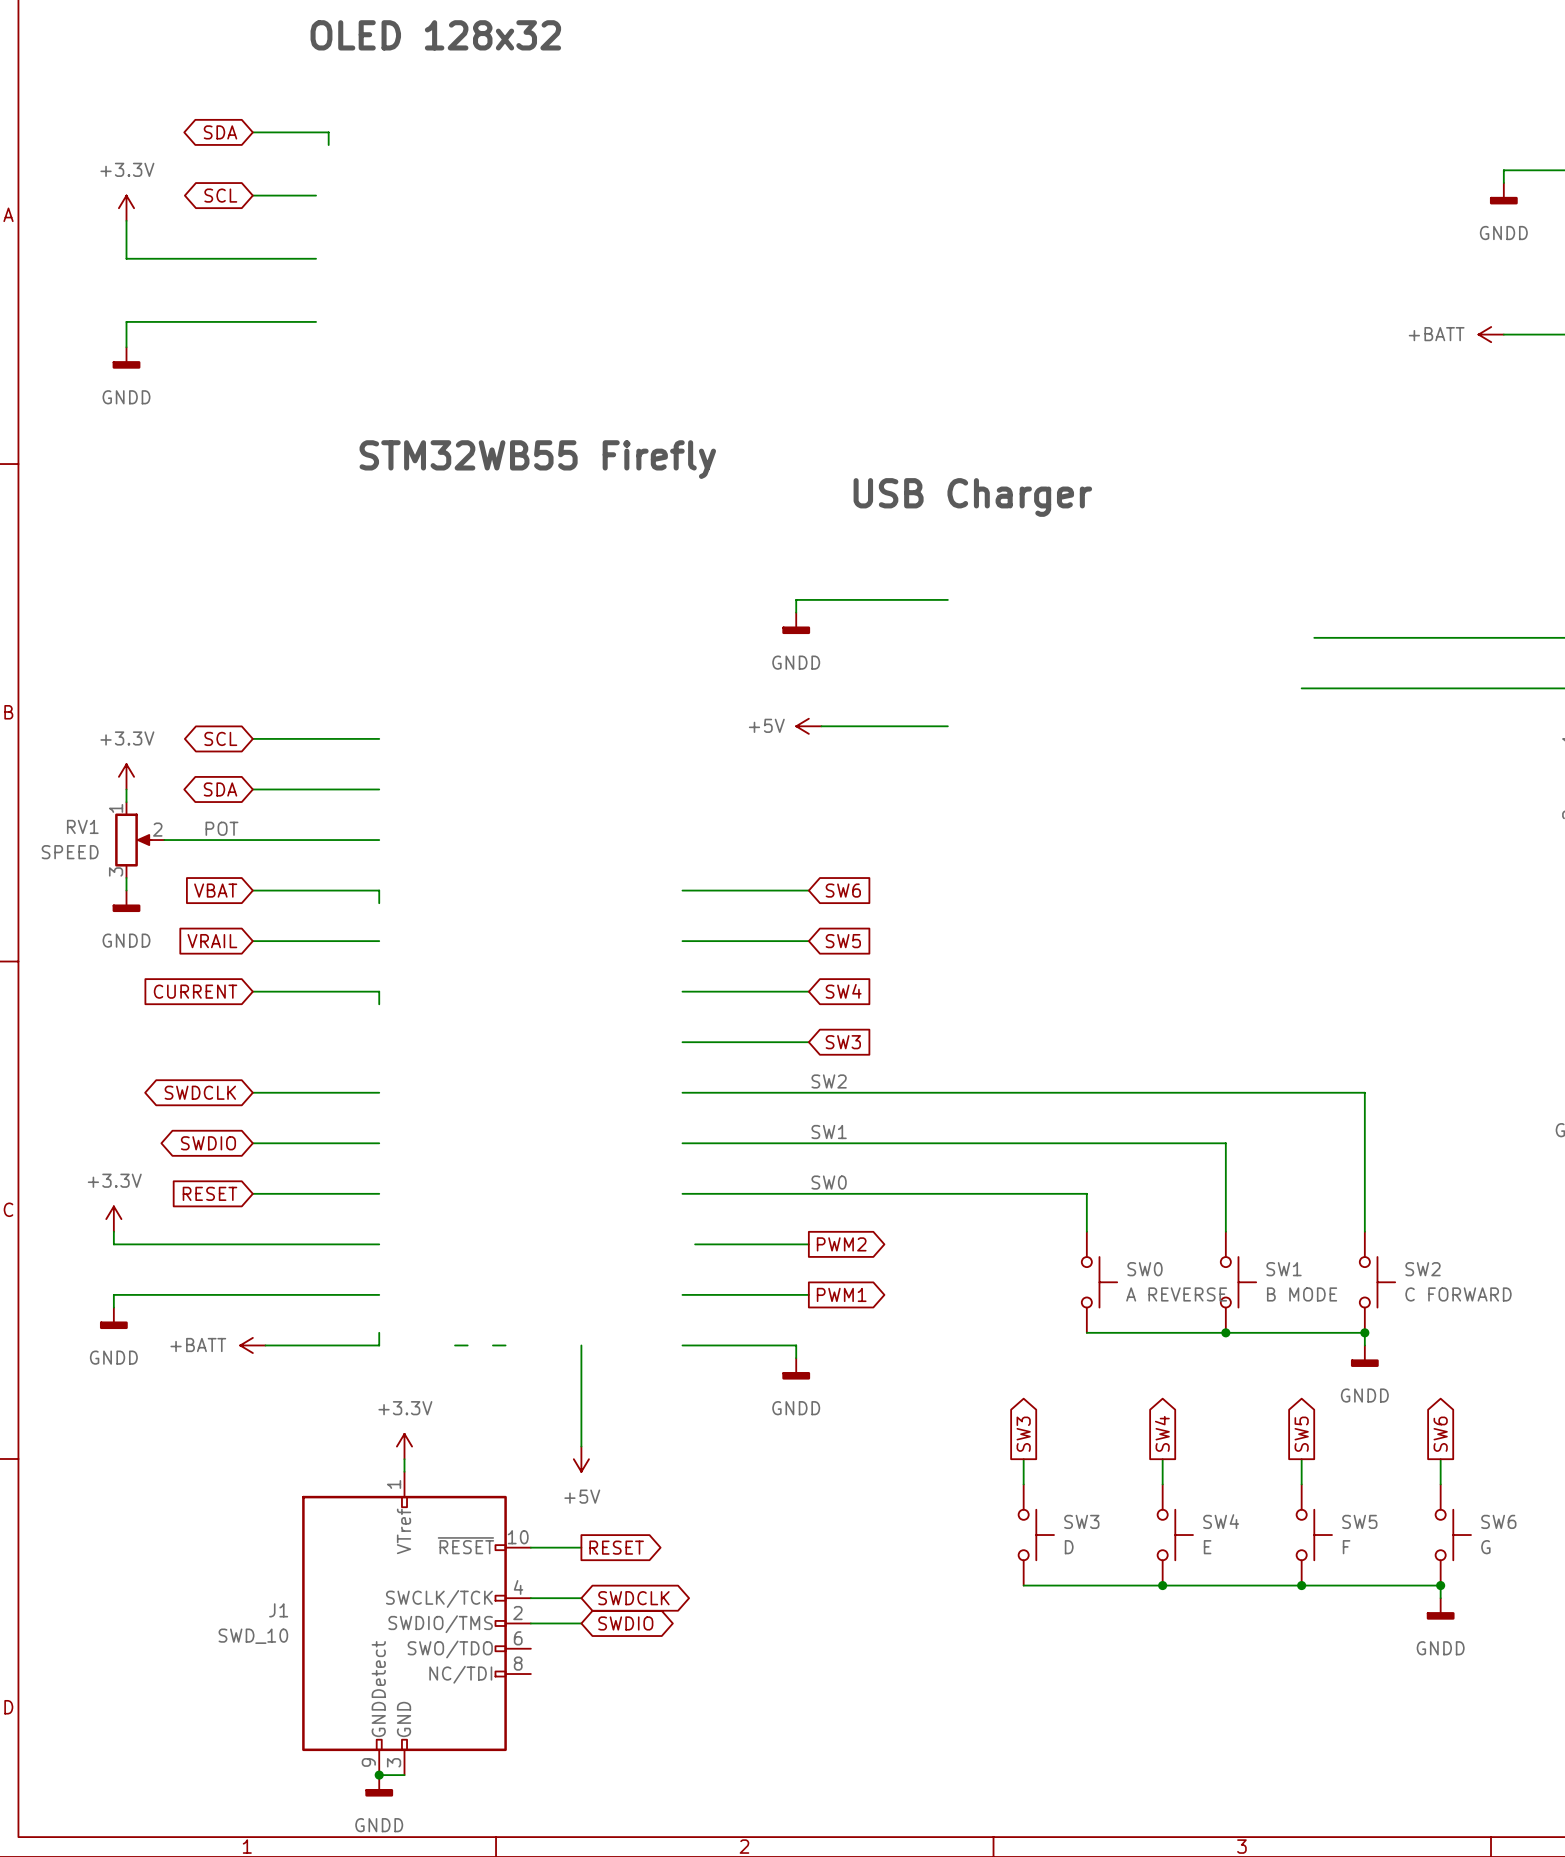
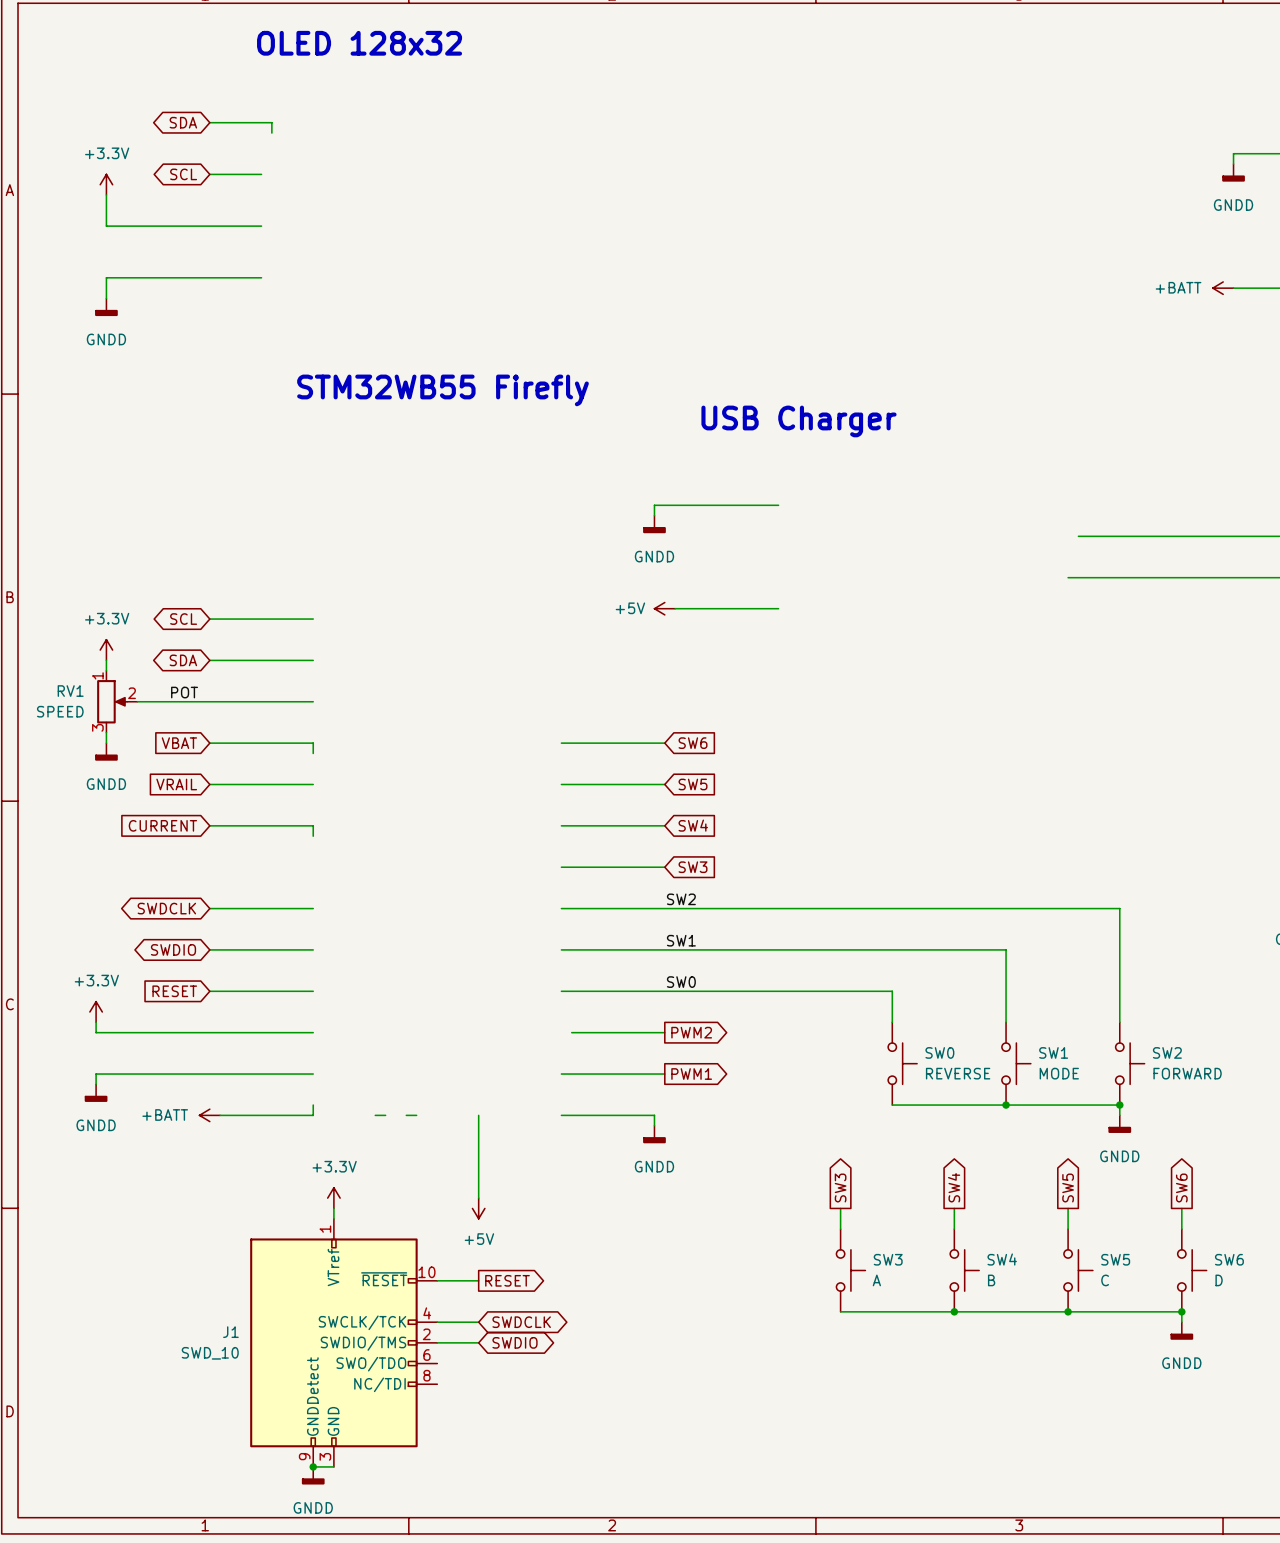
SW0 value: A REVERSE (1176, 1294) -> REVERSE (958, 1073)
SW1 value: B MODE (1302, 1294) -> MODE (1059, 1073)
SW2 value: C FORWARD (1458, 1294) -> FORWARD (1187, 1073)
SW3 value: D (1069, 1547) -> A (876, 1280)
SW4 value: E (1207, 1547) -> B (991, 1280)
SW5 value: F (1346, 1547) -> C (1105, 1280)
SW6 value: G (1485, 1547) -> D (1219, 1280)

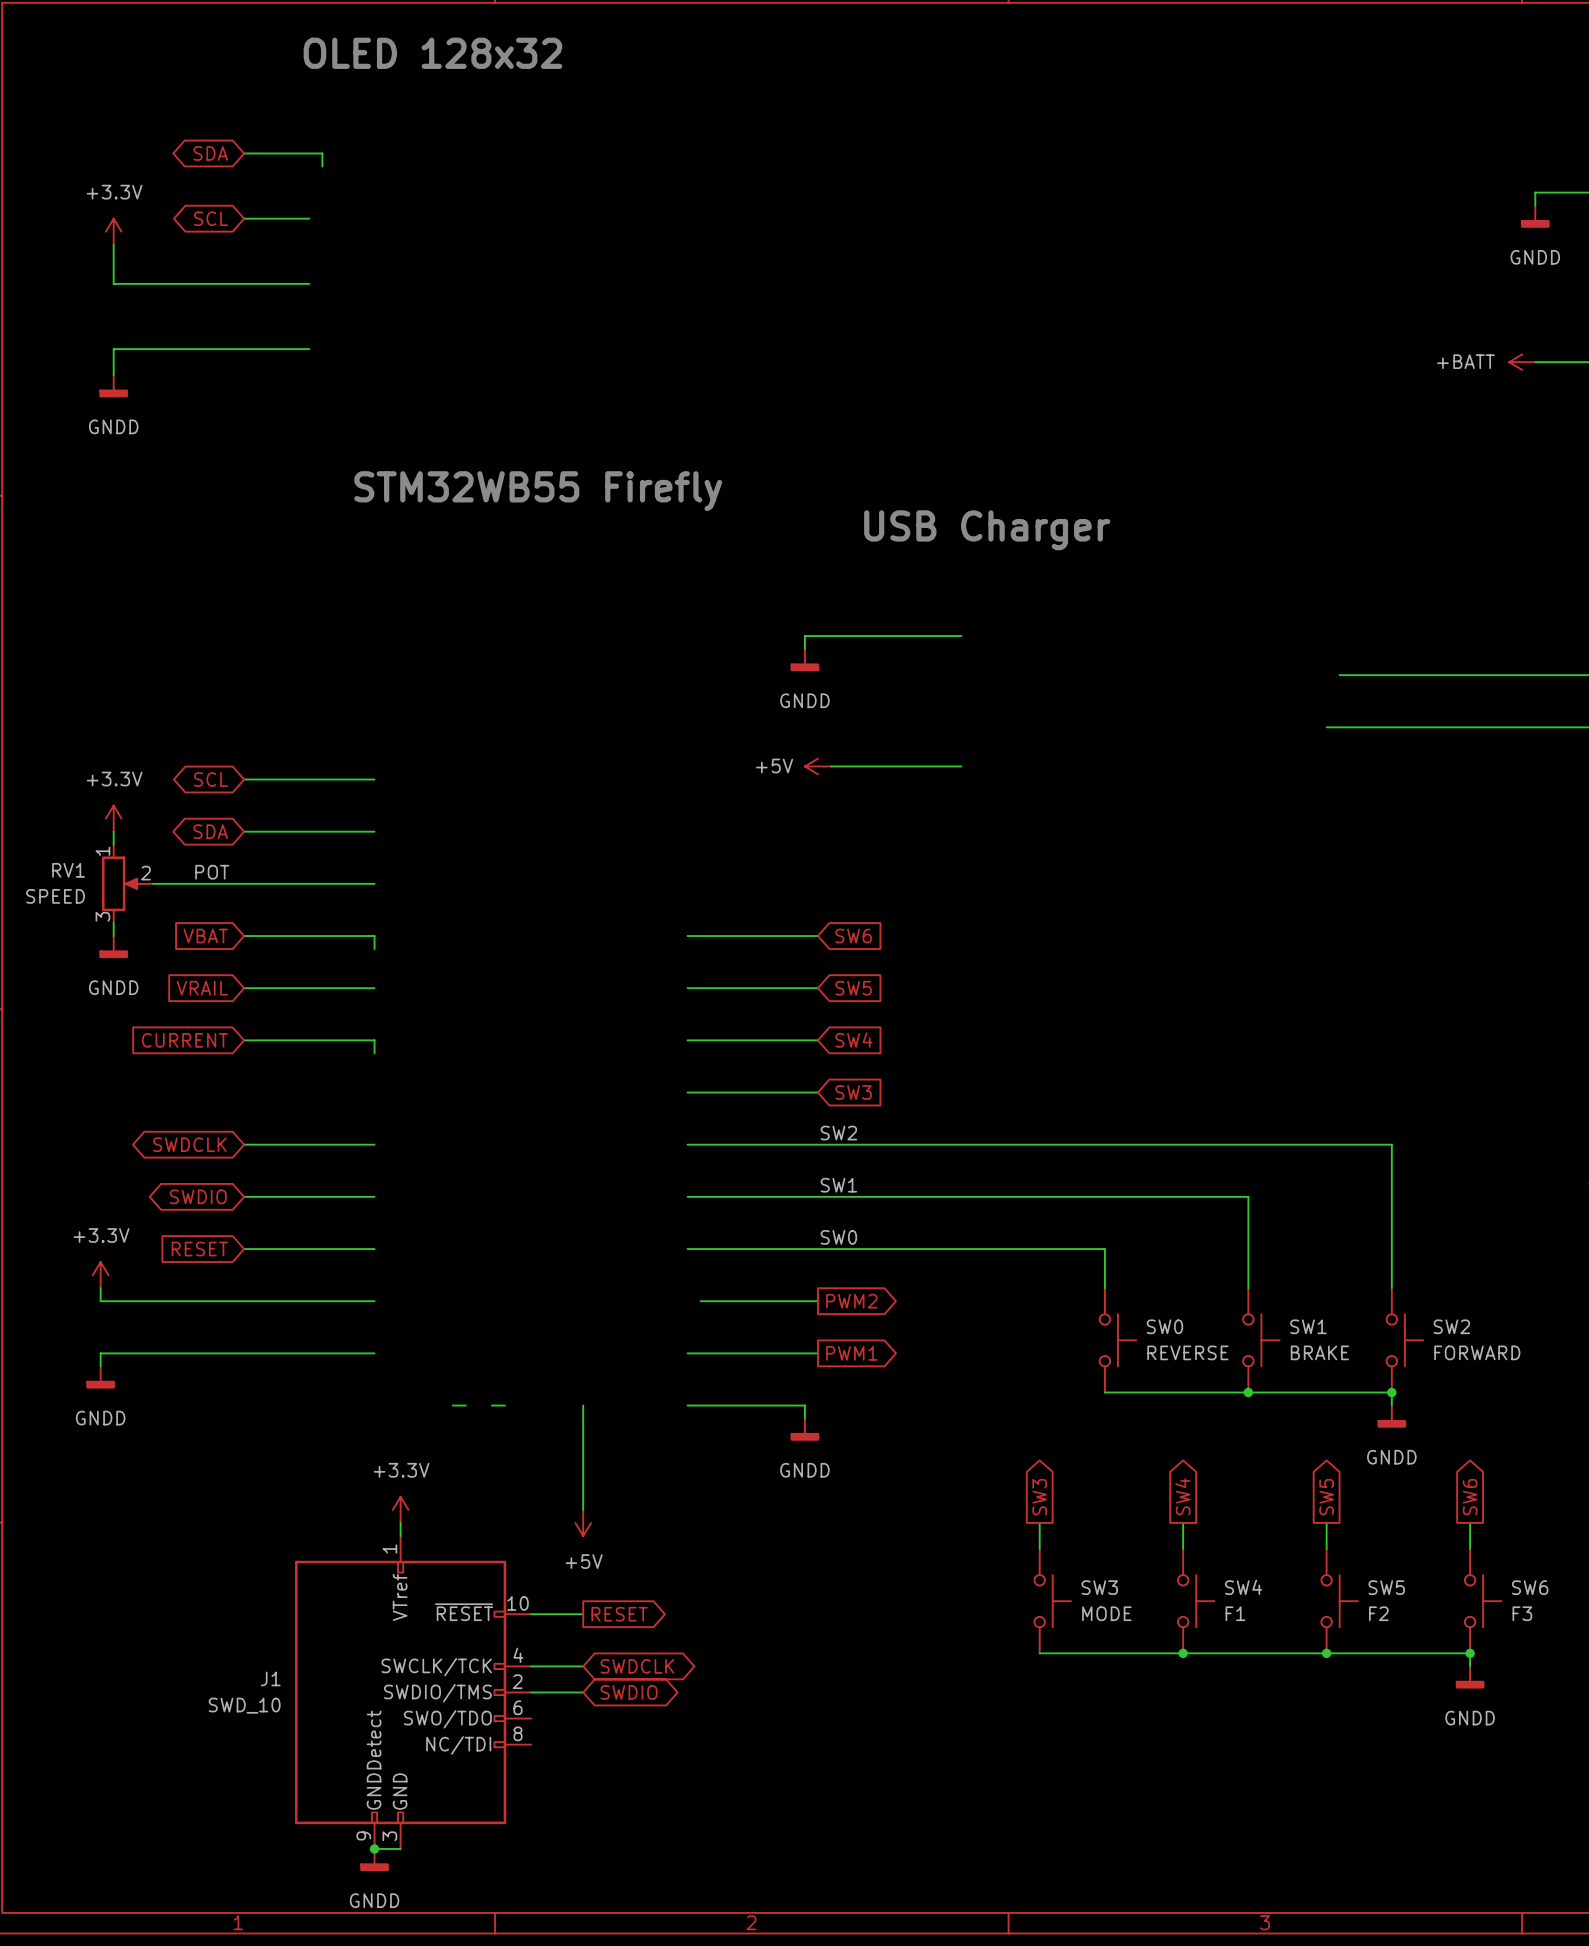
SW1 value: MODE (1059, 1073) -> BRAKE (1319, 1352)
wire: (313, 1105) (313, 1115) (220, 1115) -> none
power symbol: +BATT (209, 1115) -> none
SW3 value: A (876, 1280) -> MODE (1106, 1613)
SW4 value: B (991, 1280) -> F1 (1235, 1613)
SW5 value: C (1105, 1280) -> F2 (1378, 1613)
SW6 value: D (1219, 1280) -> F3 (1522, 1613)

